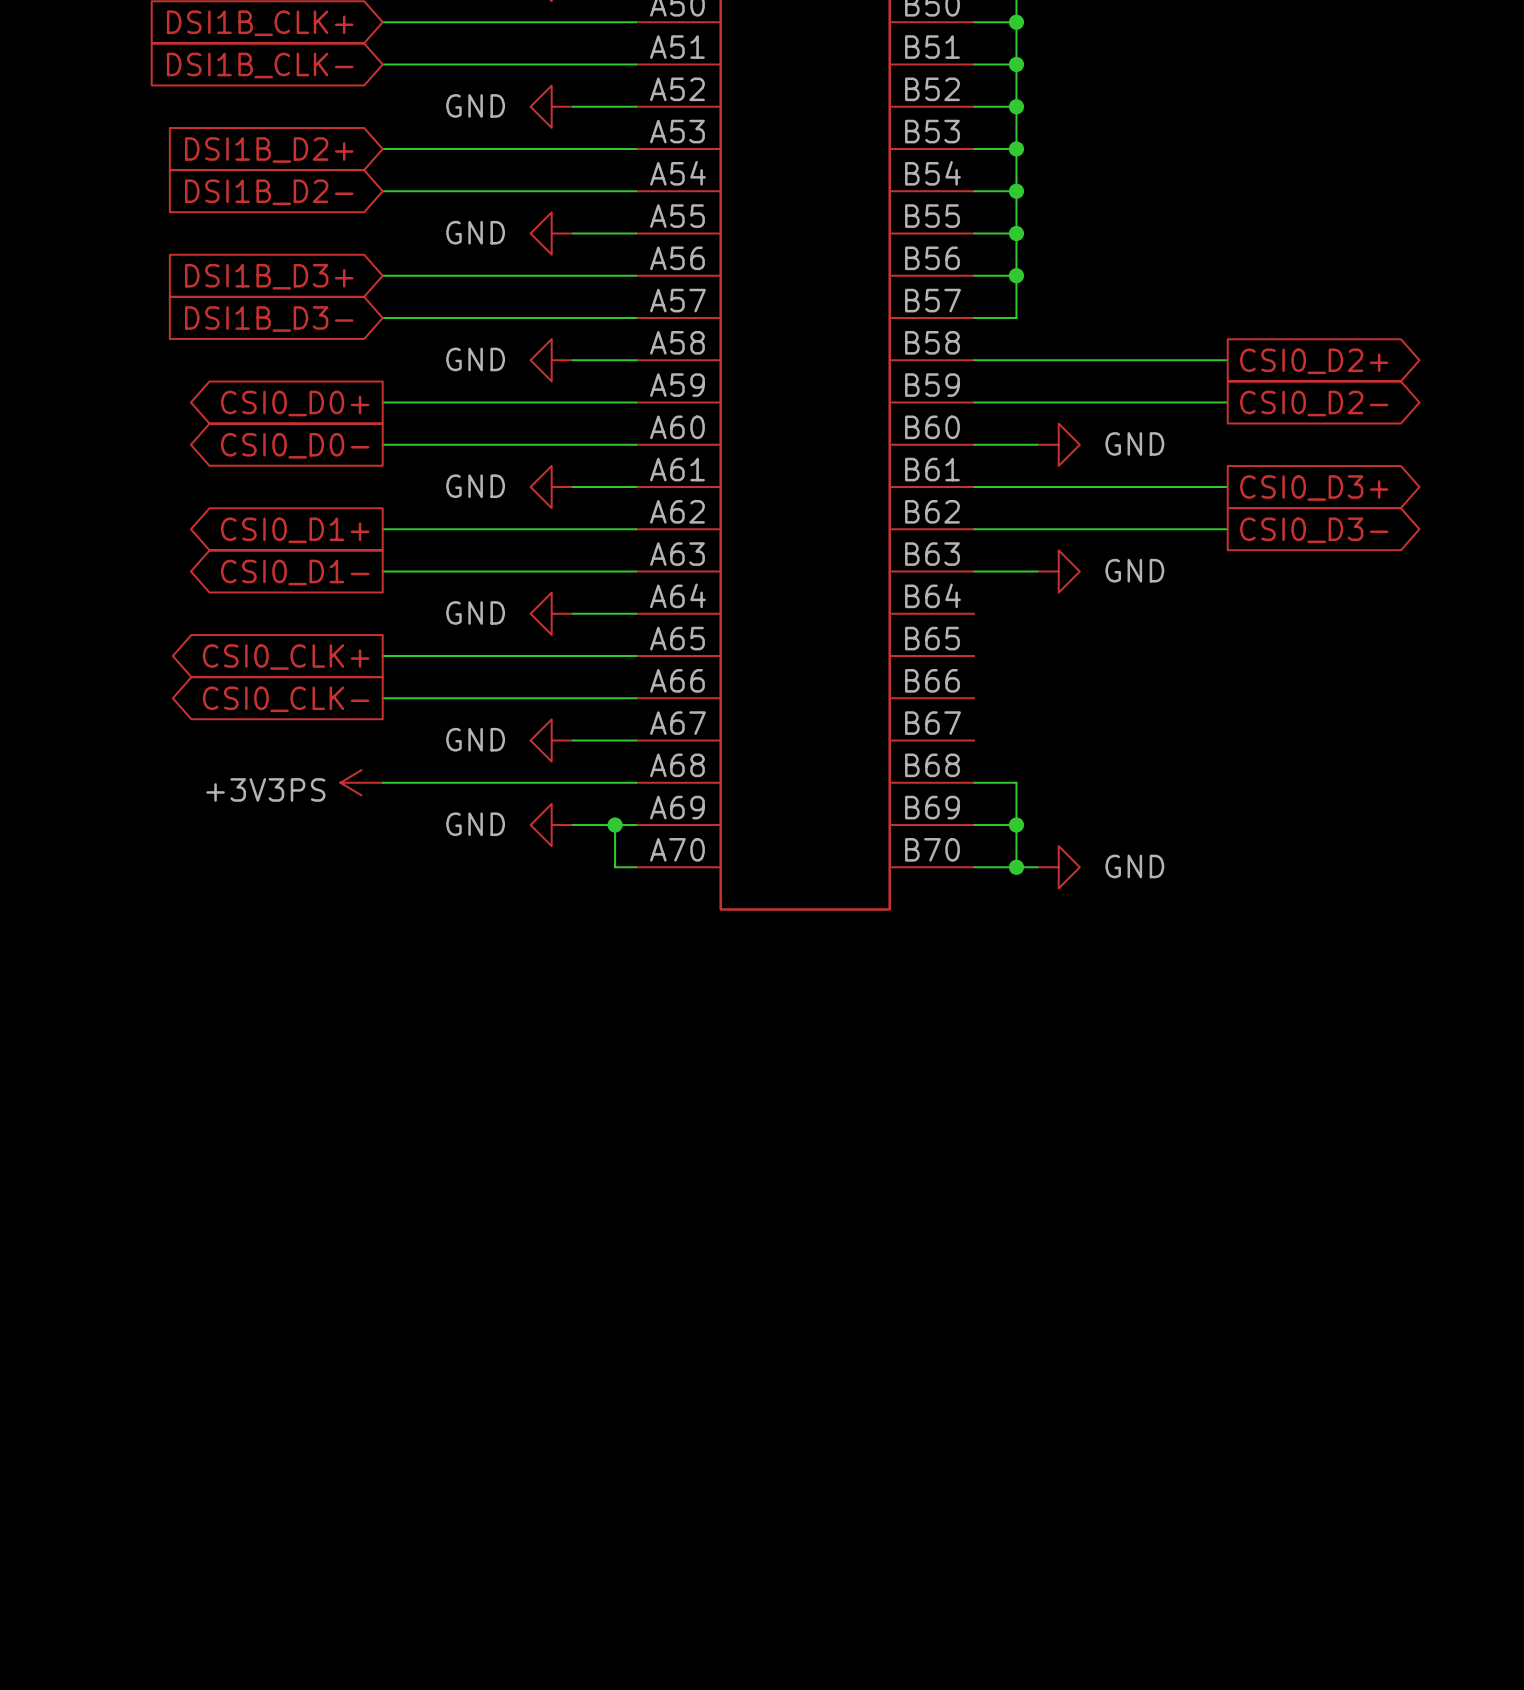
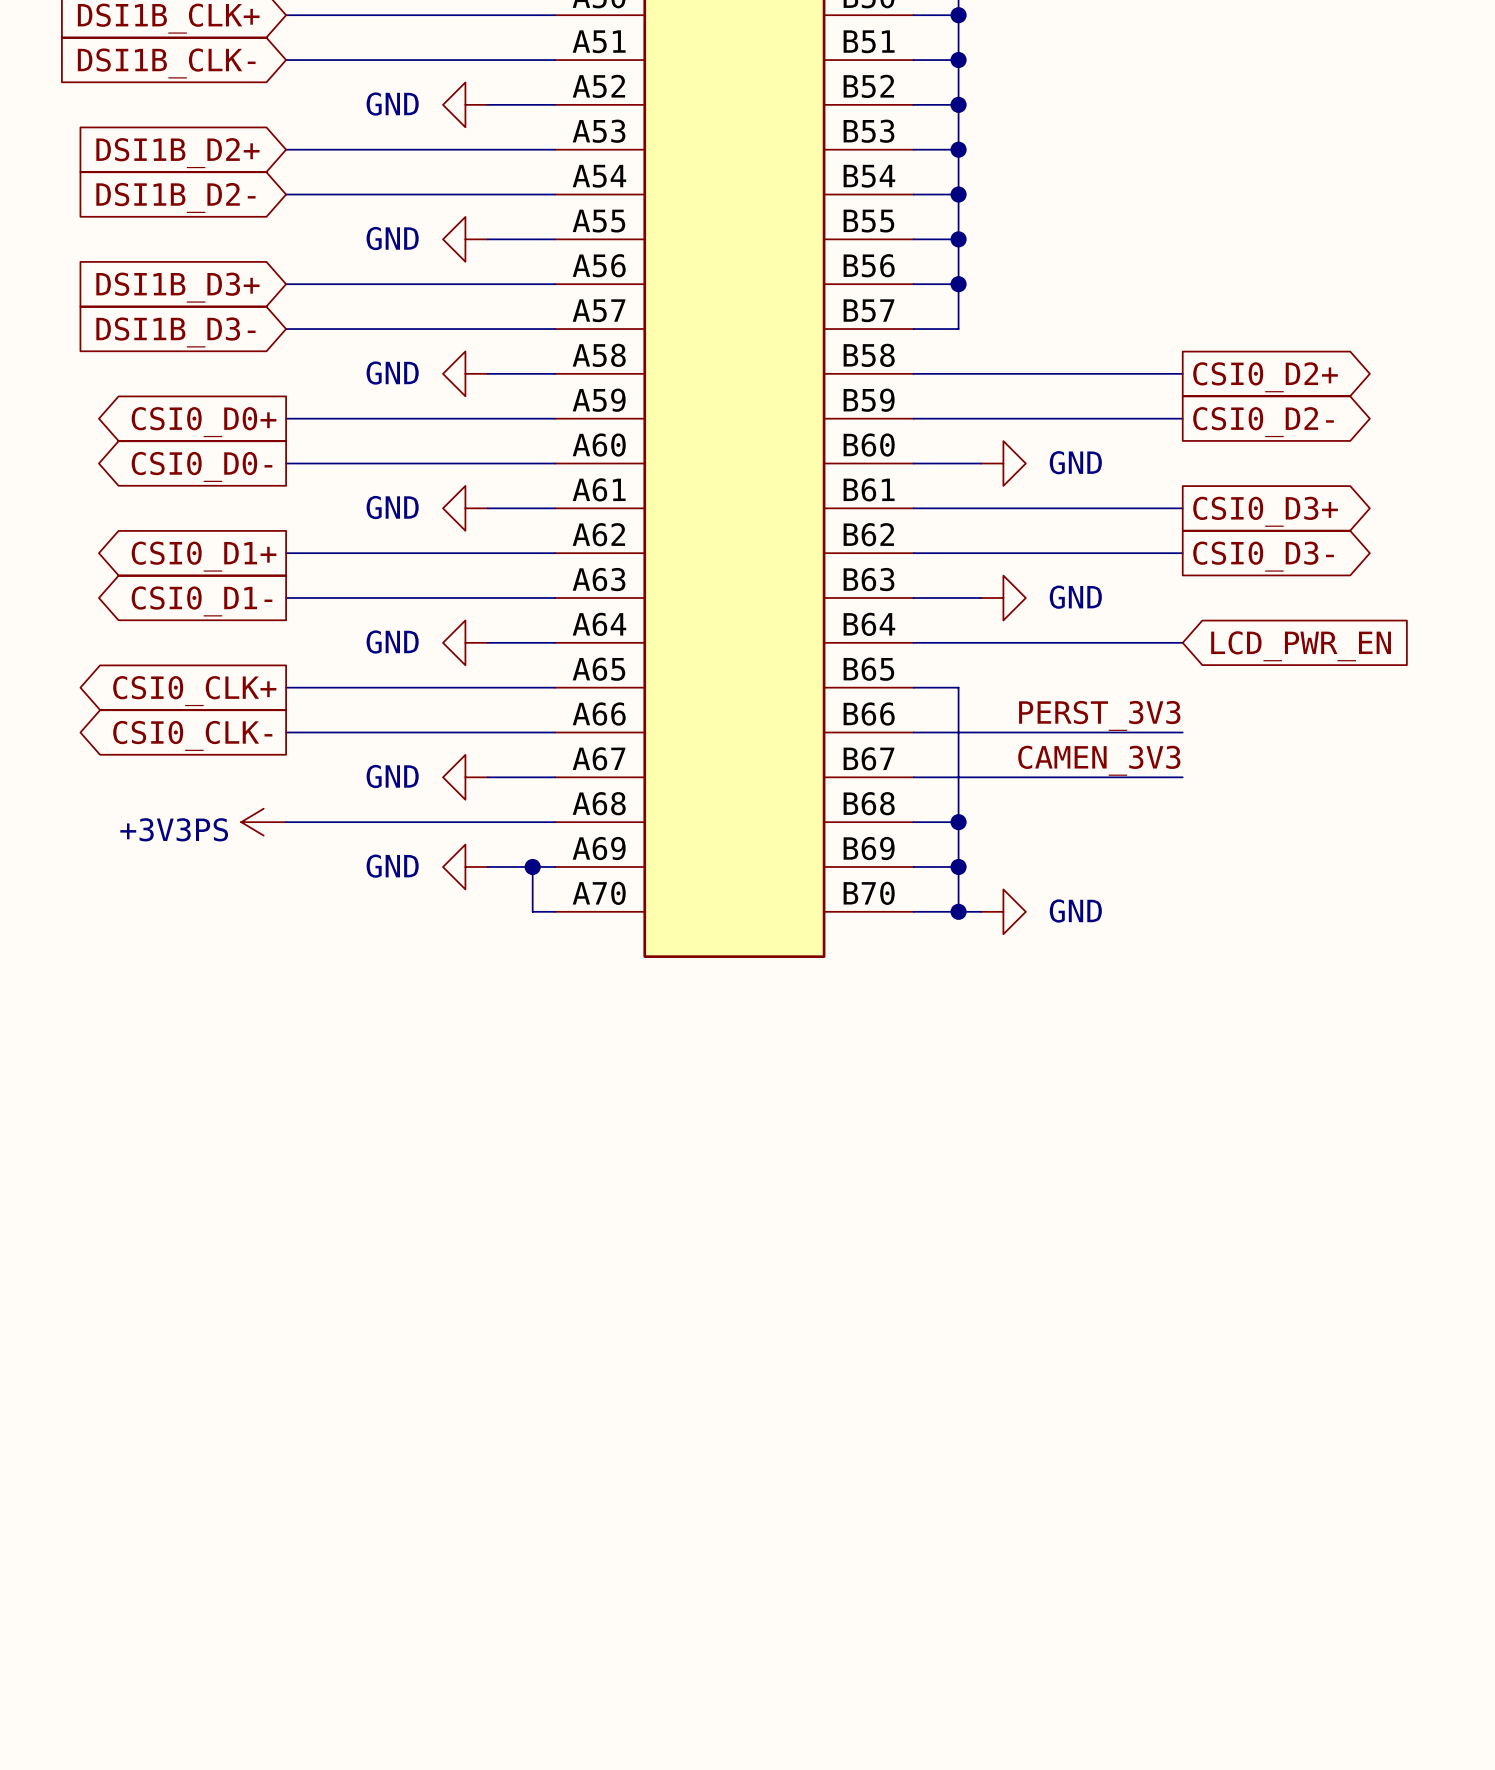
wire: none -> (913, 642) (1182, 642)
global label: none -> LCD_PWR_EN (1301, 646)
wire: none -> (913, 687) (958, 687) (958, 822)
label: none -> PERST_3V3 (1099, 715)
wire: none -> (913, 732) (1182, 732)
label: none -> CAMEN_3V3 (1099, 760)
wire: none -> (913, 777) (1182, 777)
junction: none -> (958, 822)

